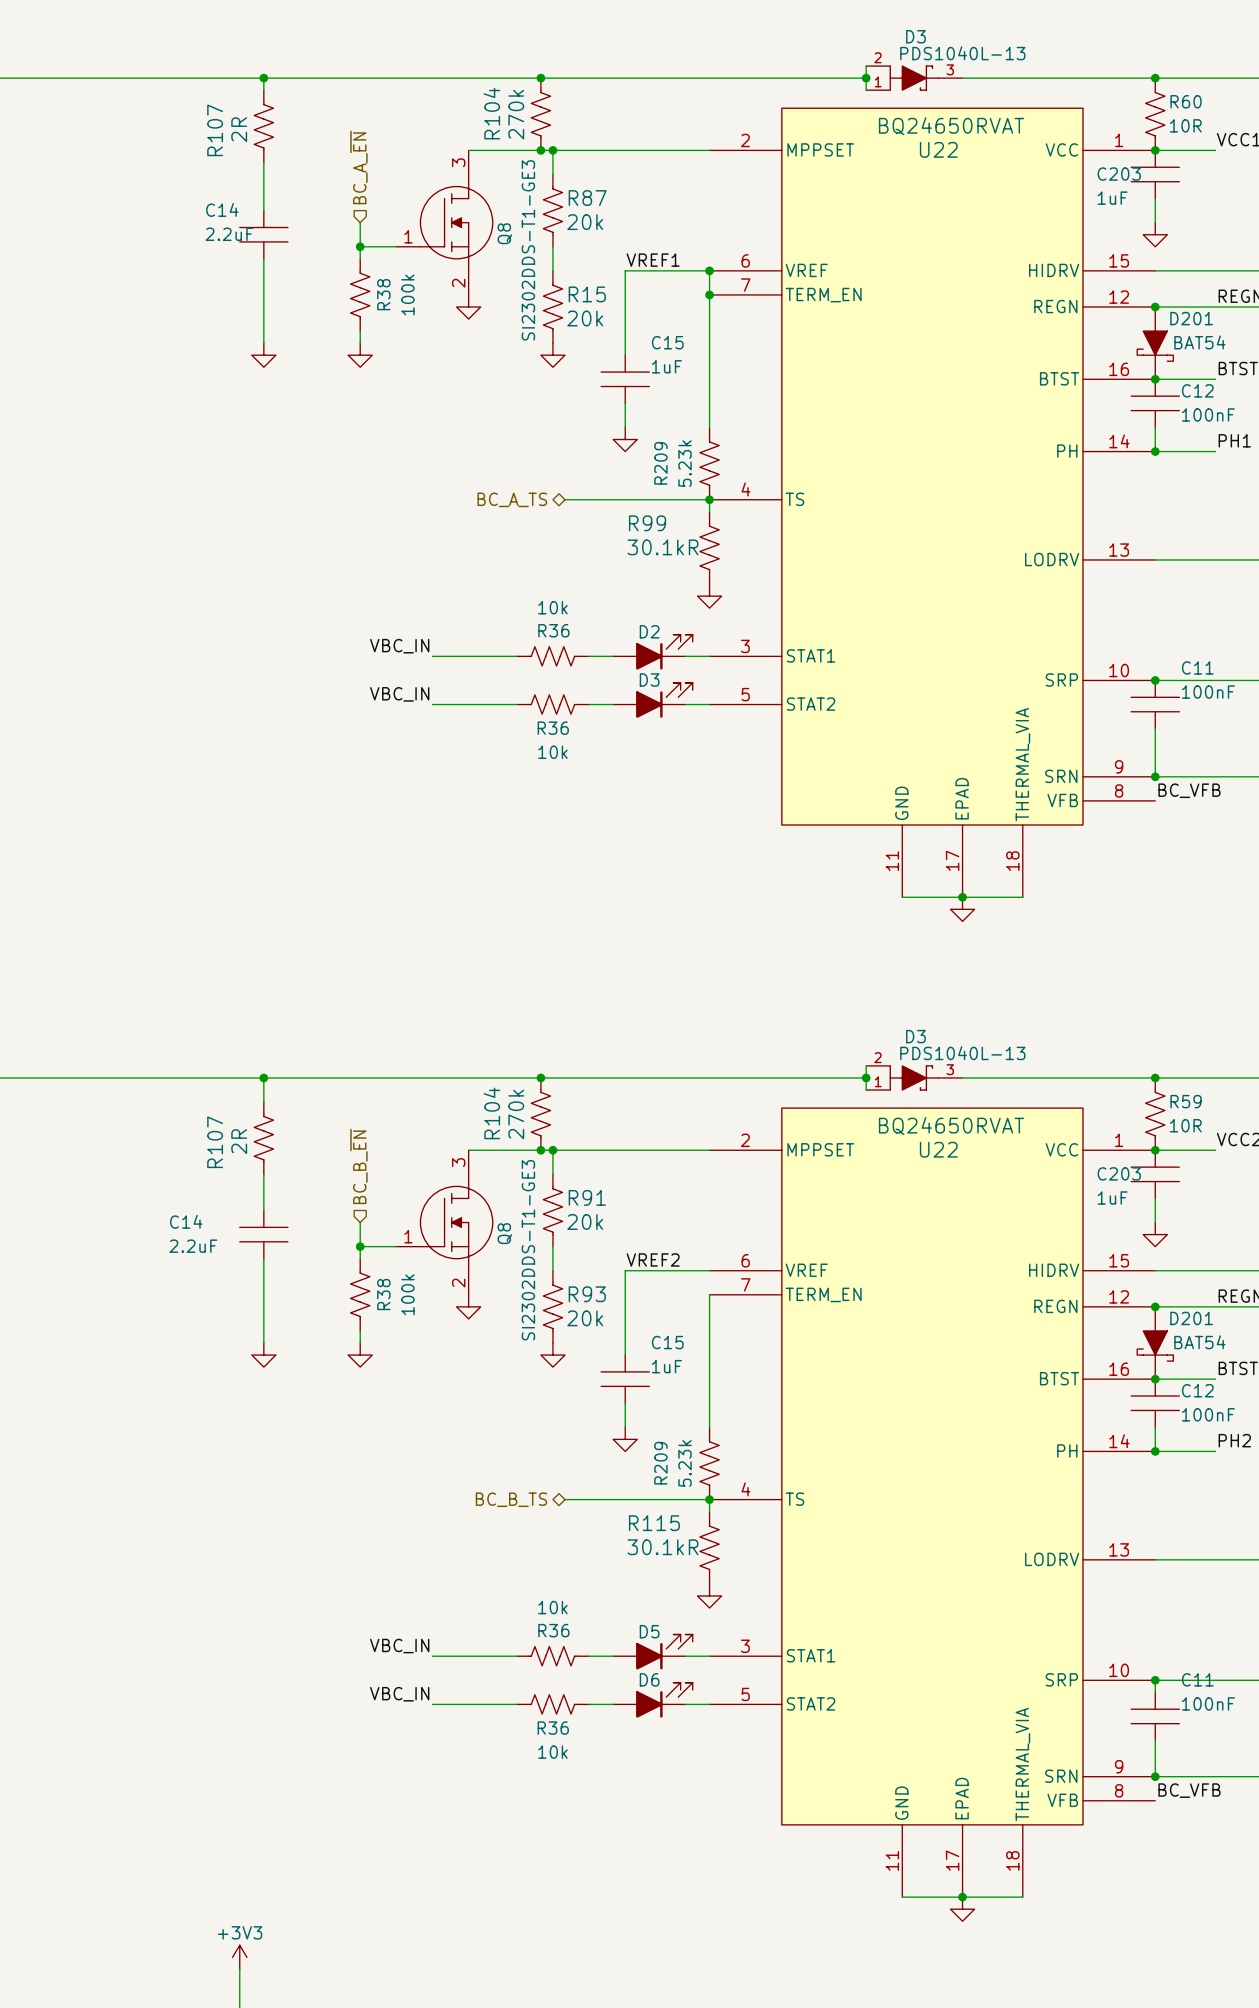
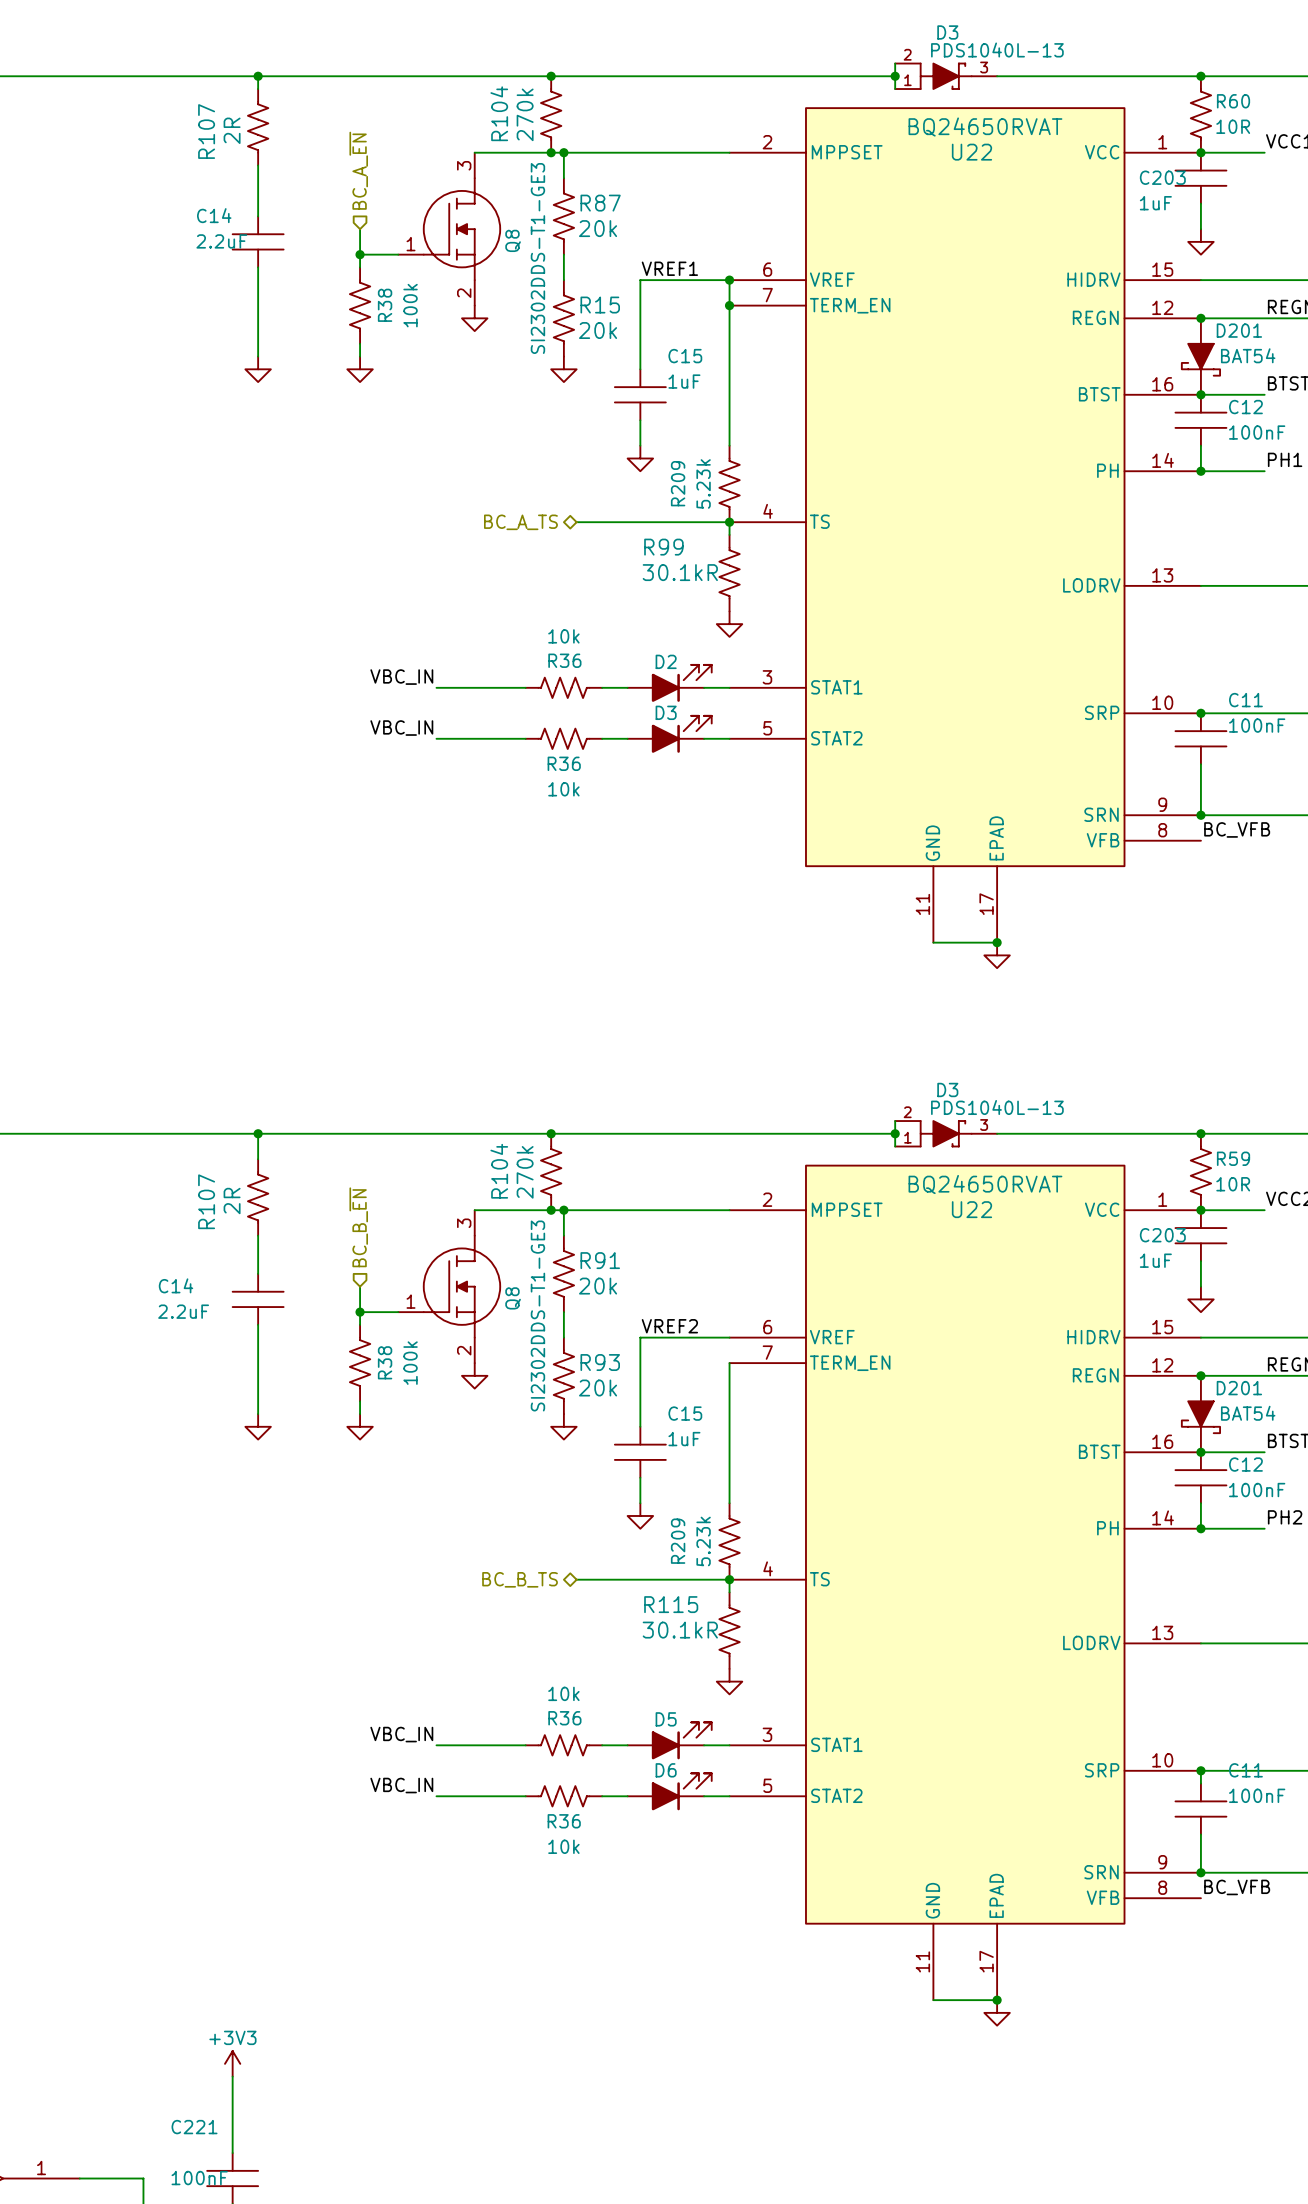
U22 symbol: [709, 108, 1156, 898] -> [729, 108, 1201, 943]
wire: (962, 897) (1022, 897) -> none
U22 symbol: [709, 1108, 1156, 1898] -> [729, 1165, 1201, 2001]
wire: (962, 1897) (1022, 1897) -> none

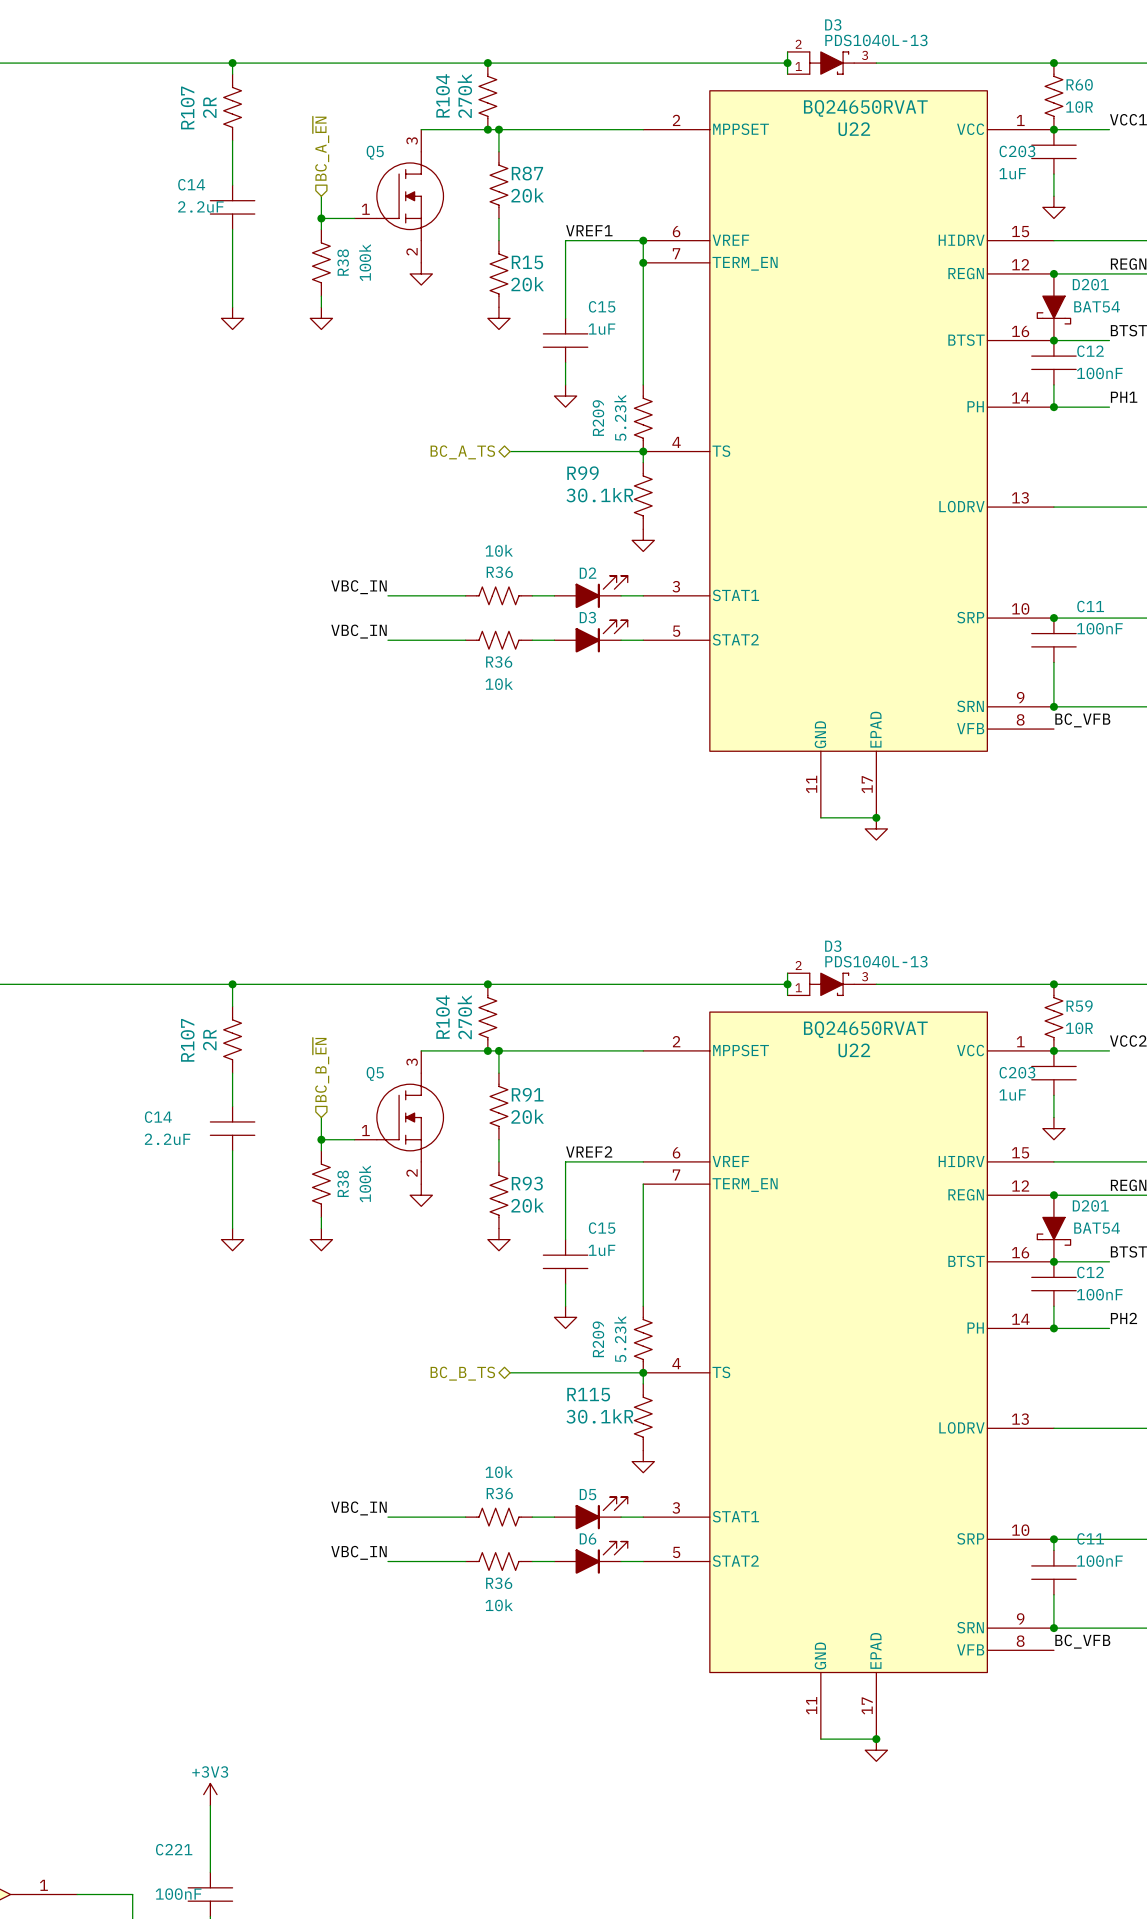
Q8 name: Q8 (513, 240) -> Q5 (375, 152)
Q8 value: SI2302DDS-T1-GE3 (537, 258) -> none
Q8 name: Q8 (513, 1298) -> Q5 (375, 1073)
Q8 value: SI2302DDS-T1-GE3 (537, 1315) -> none

